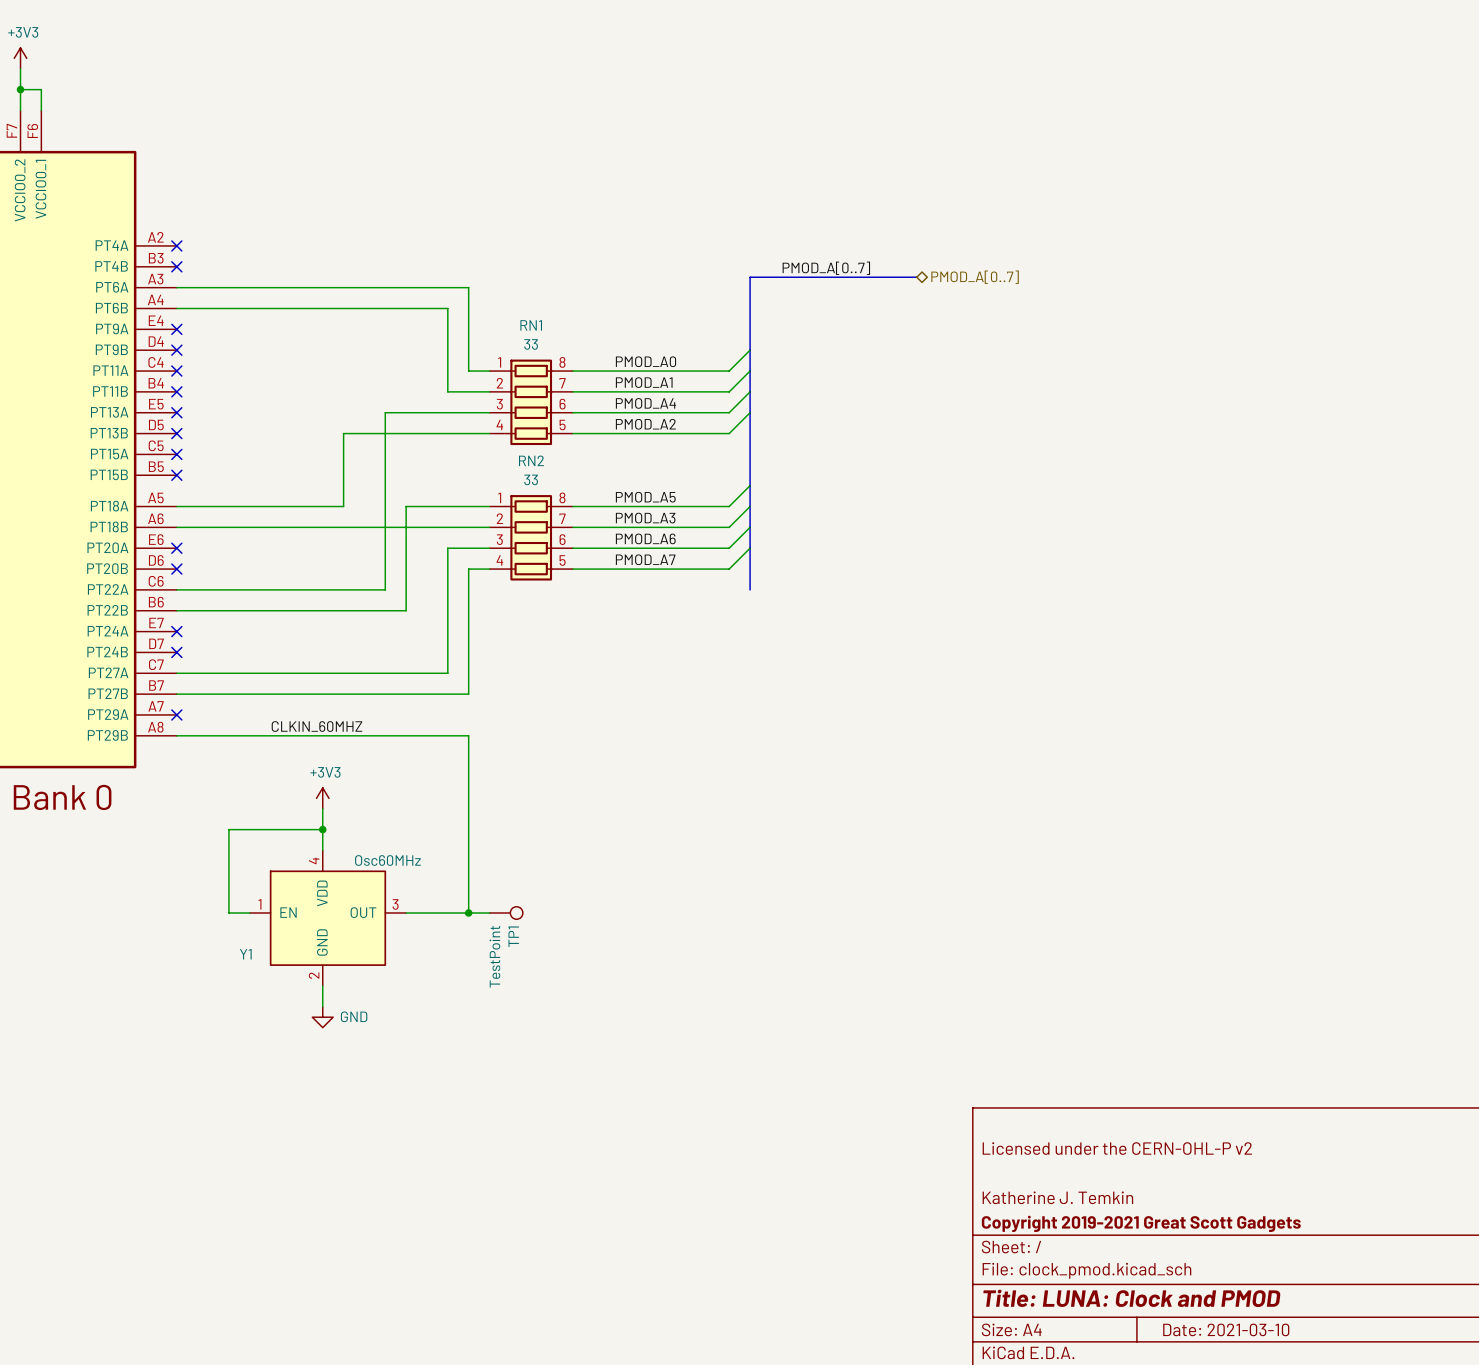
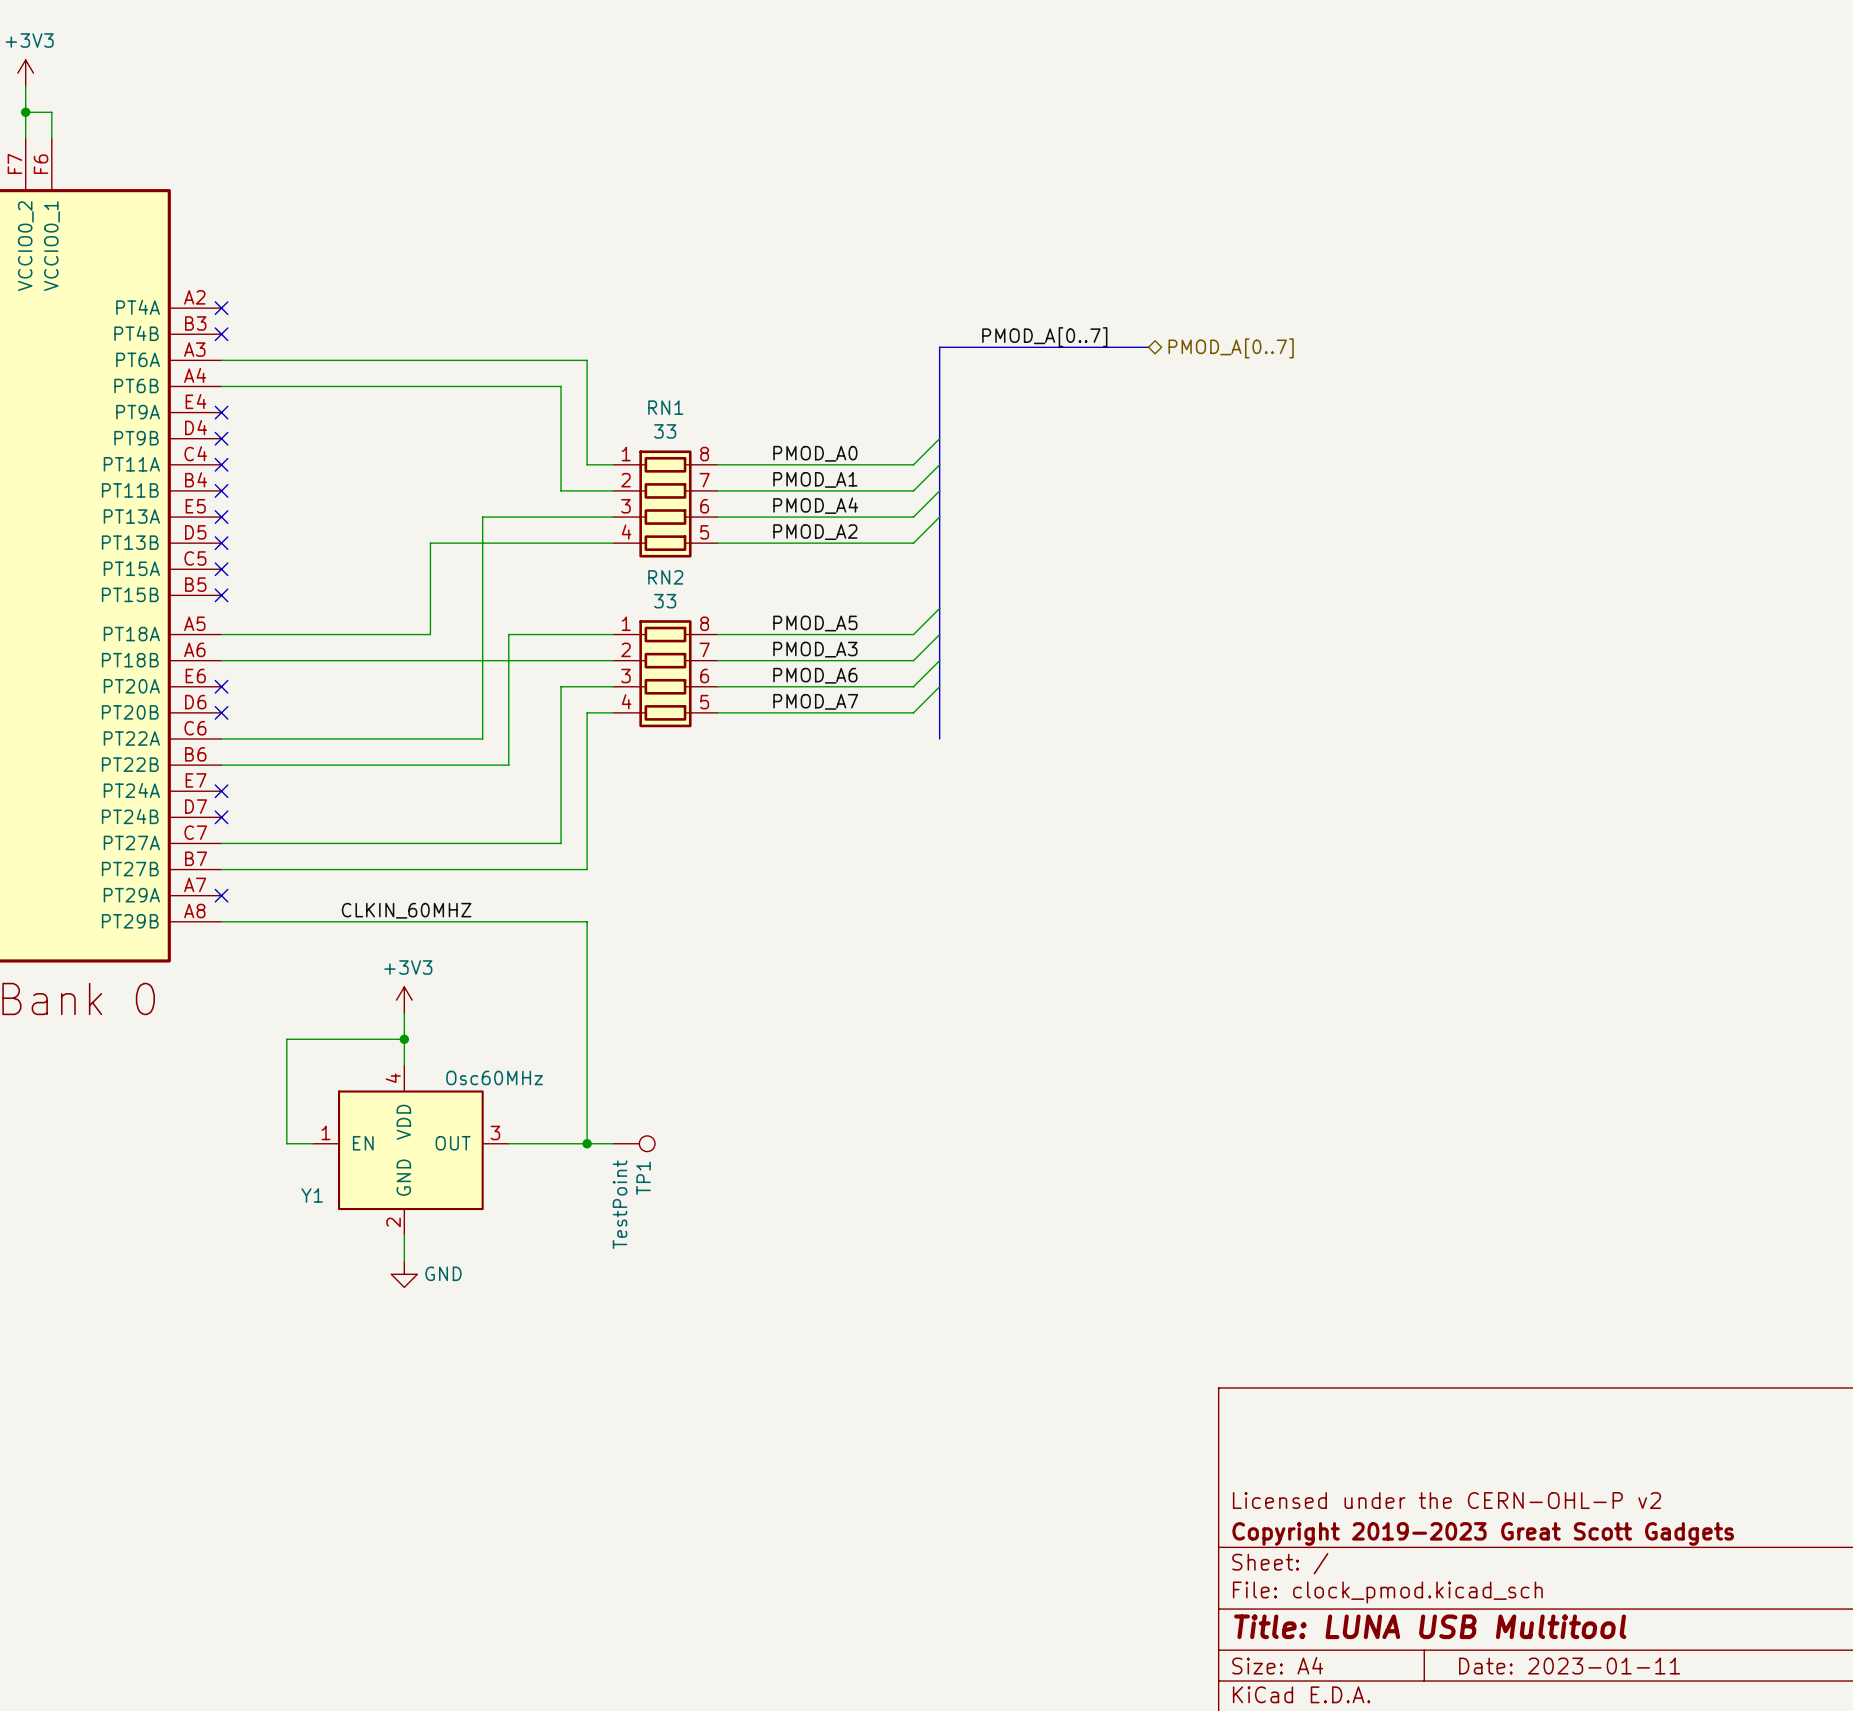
title block: Licensed under the CERN-OHL-P v2 (1117, 1148) -> none
title block: Katherine J. Temkin (1057, 1197) -> Licensed under the CERN-OHL-P v2 (1446, 1500)
title block: Copyright 2019-2021 Great Scott Gadgets (1141, 1223) -> Copyright 2019-2023 Great Scott Gadgets (1483, 1533)
title block: Title: LUNA: Clock and PMOD (1131, 1298) -> Title: LUNA USB Multitool (1430, 1626)
title block: Date: 2021-03-10 (1226, 1329) -> Date: 2023-01-11 (1569, 1666)

